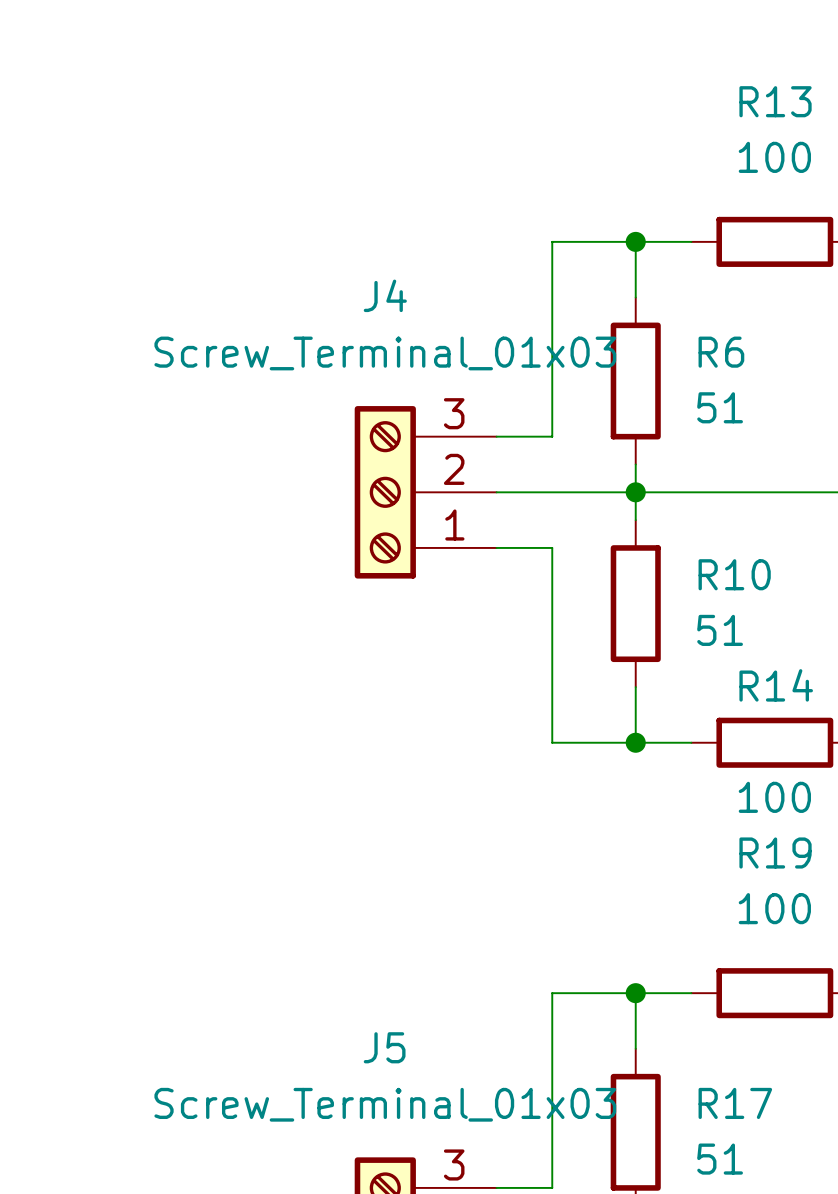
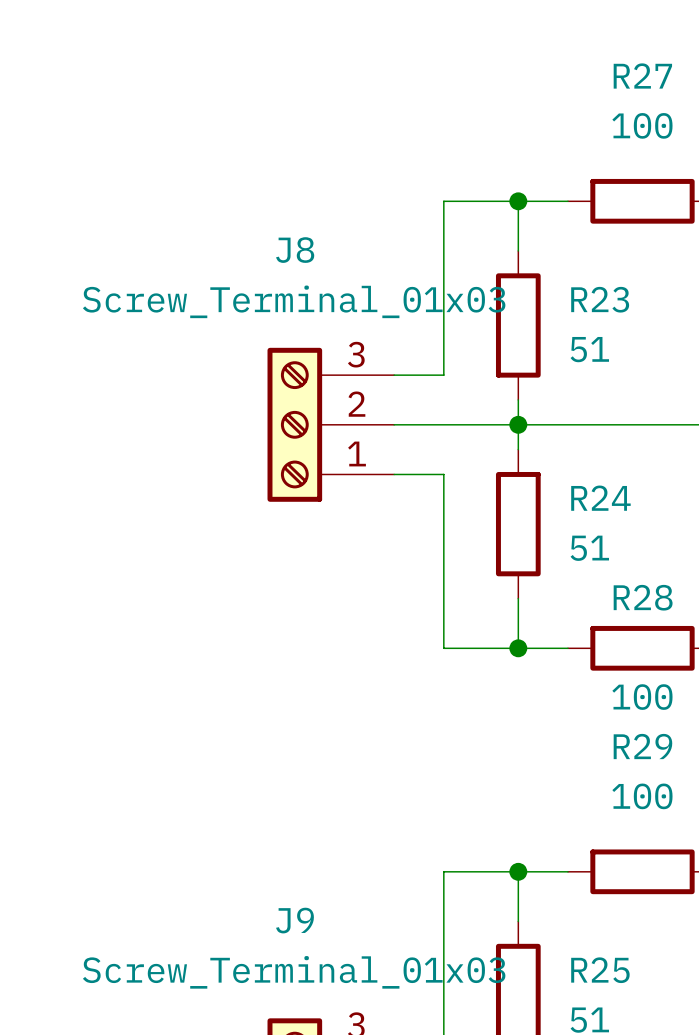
R13 name: R13 (775, 101) -> R27 (642, 76)
J4 name: J4 (385, 295) -> J8 (295, 250)
R6 name: R6 (721, 352) -> R23 (600, 299)
R10 name: R10 (734, 574) -> R24 (600, 498)
R14 name: R14 (776, 685) -> R28 (643, 597)
R19 name: R19 (775, 853) -> R29 (642, 746)
J5 name: J5 (384, 1047) -> J9 (295, 920)
R17 name: R17 (735, 1103) -> R25 (600, 970)

